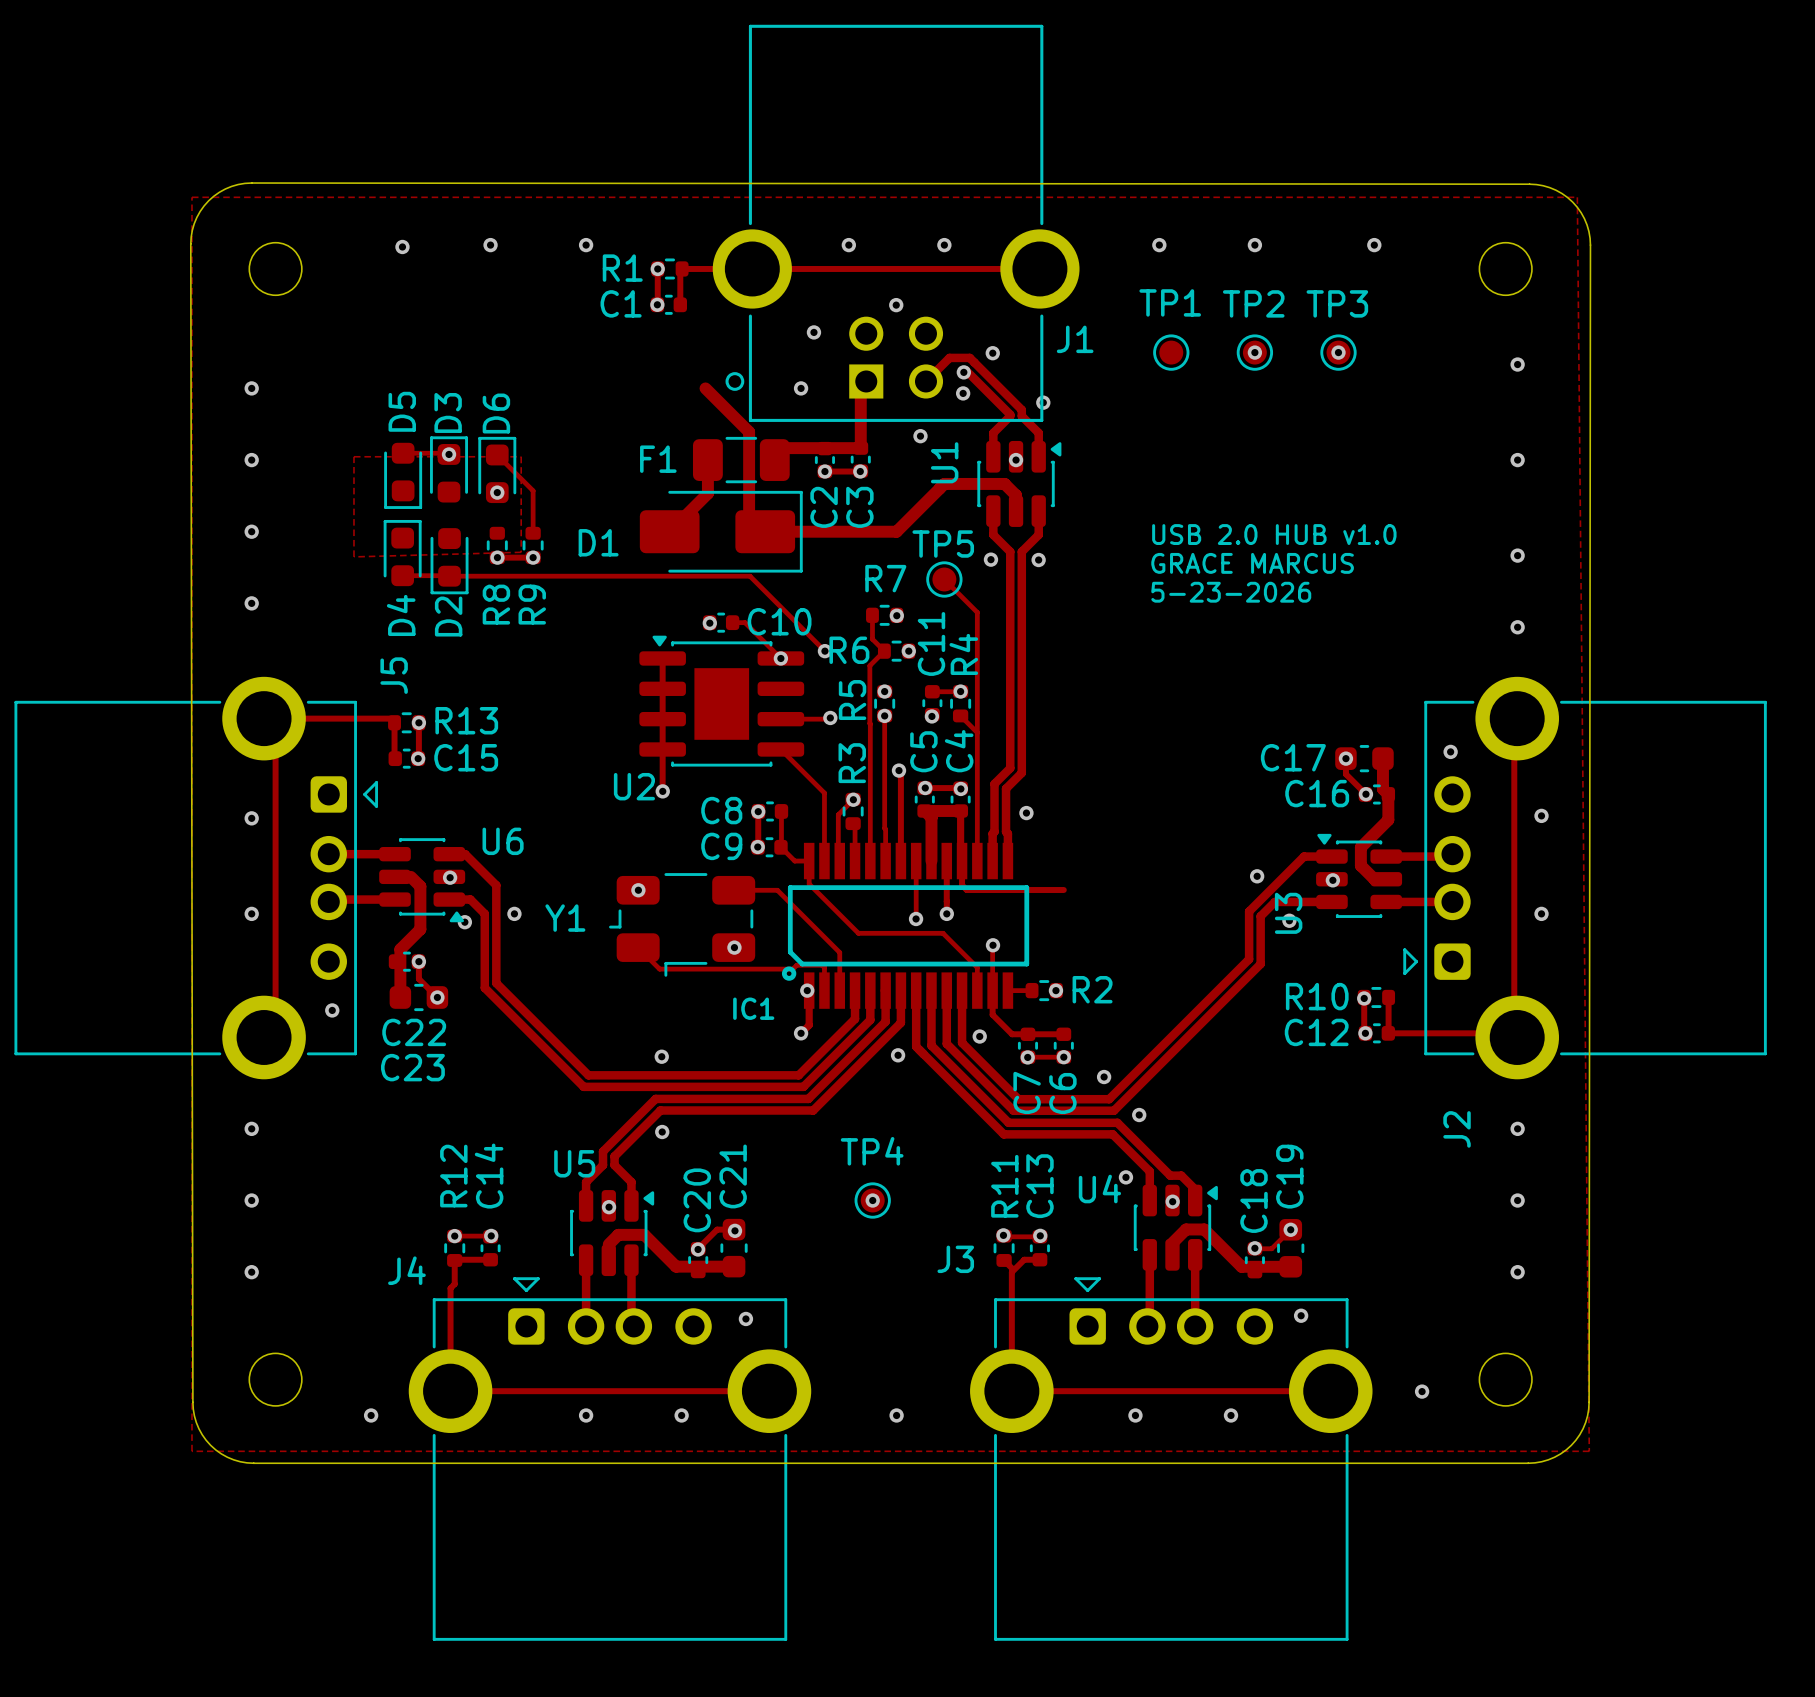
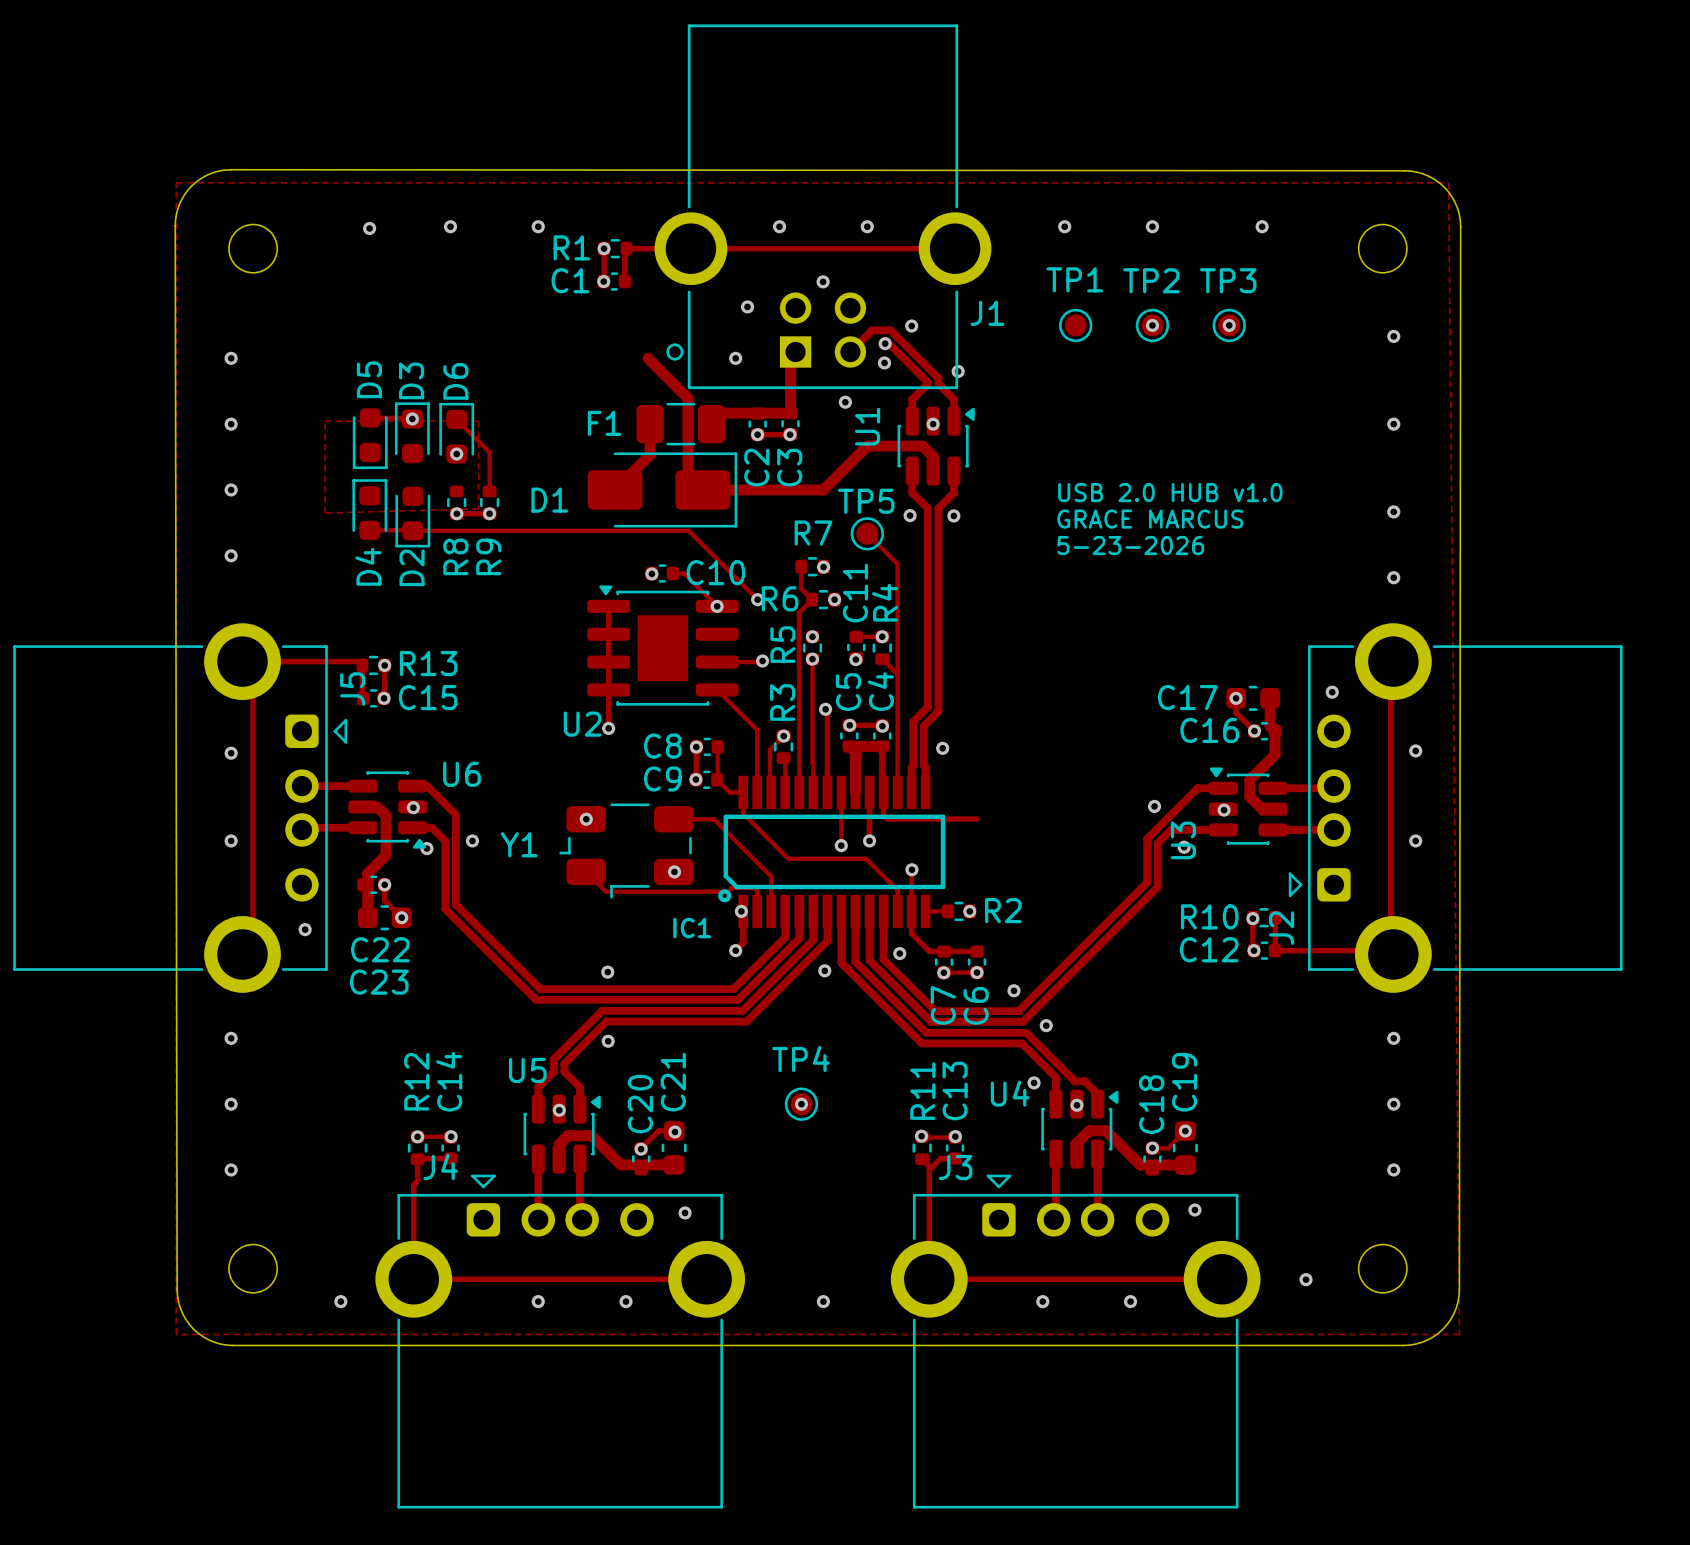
J5 name position: J5 (394, 675) -> J5 (352, 689)
J2 name position: J2 (1457, 1129) -> J2 (1281, 928)
J3 name position: J3 (955, 1259) -> J3 (955, 1167)
J4 name position: J4 (406, 1270) -> J4 (440, 1166)

